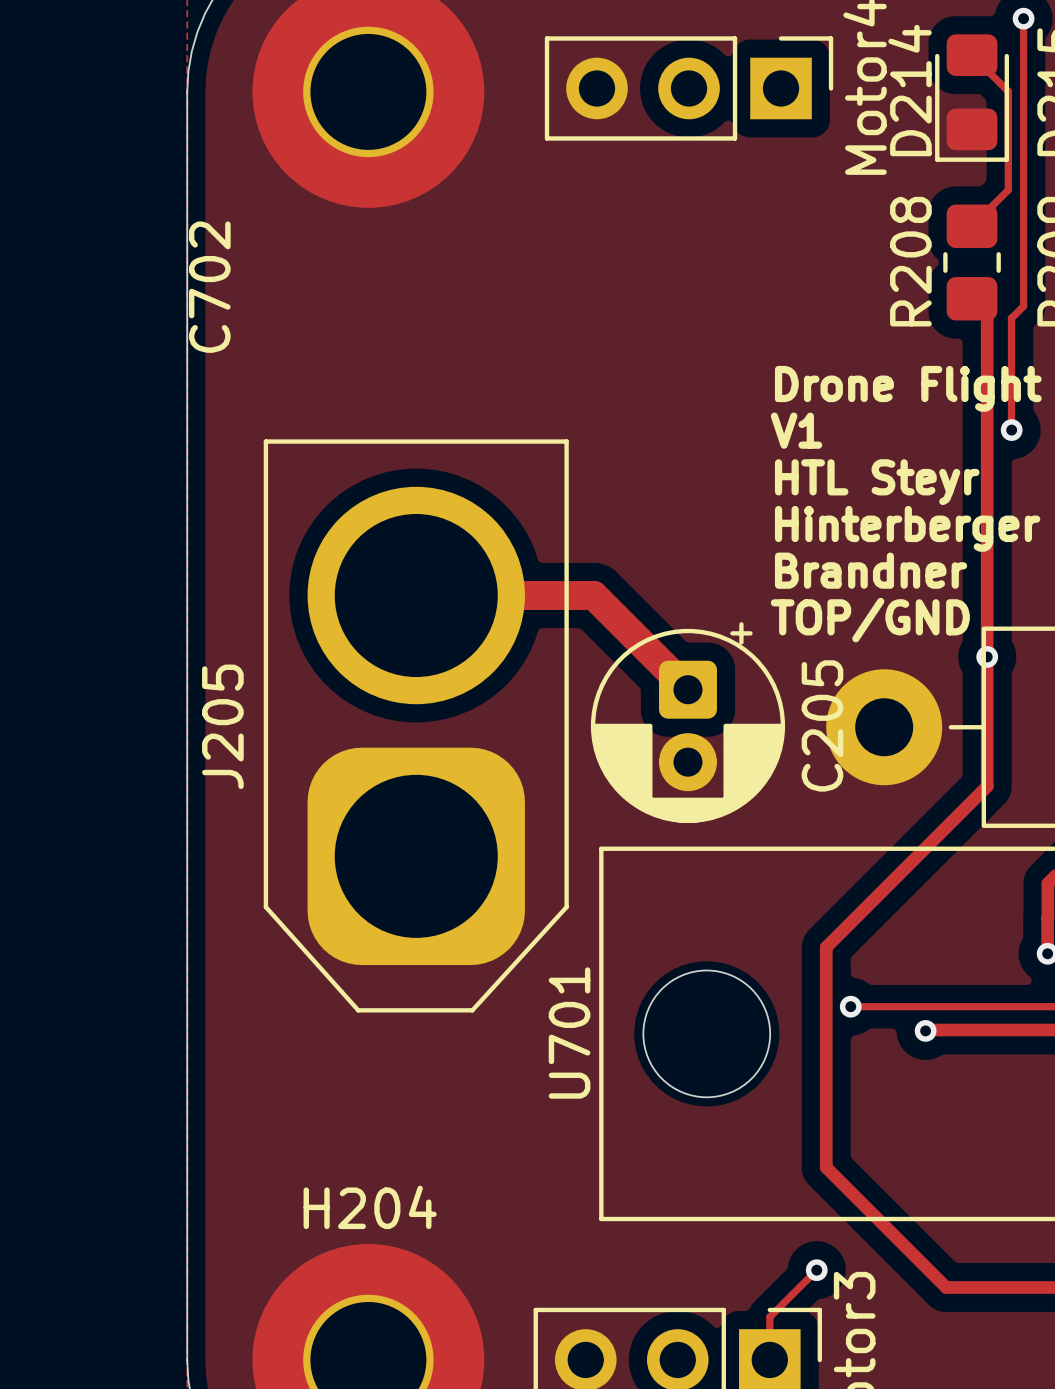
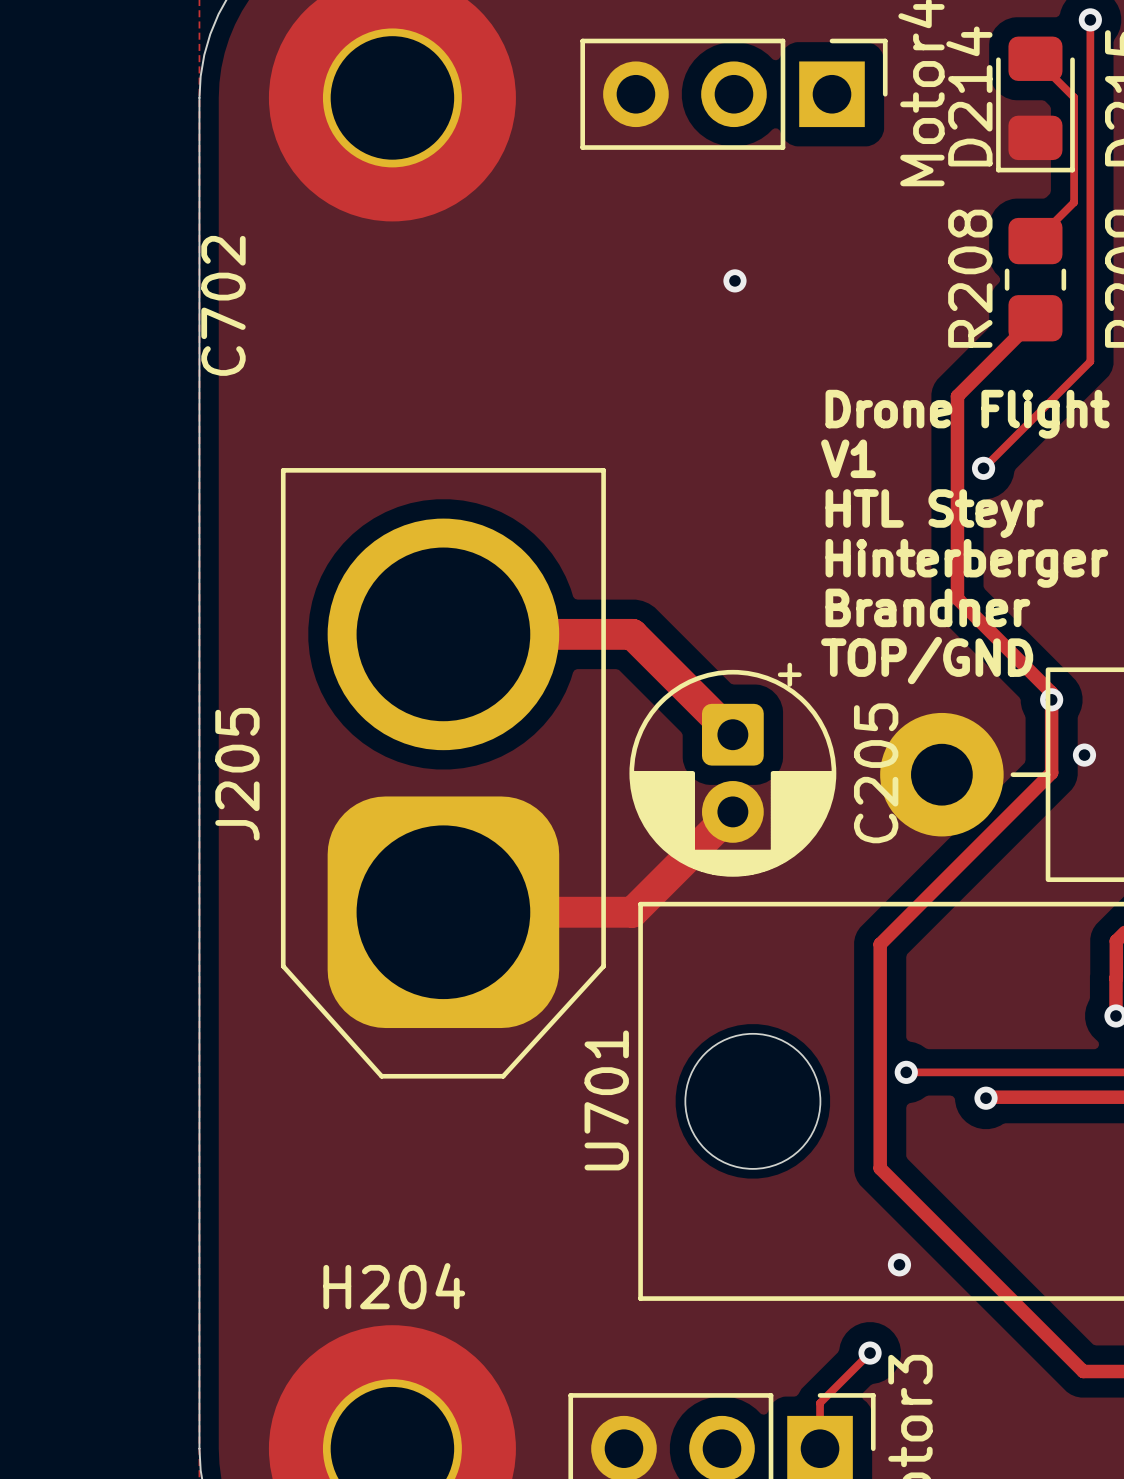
via: none -> (734, 280)
track: (972, 298) (987, 313) (987, 650) -> (1035, 318) (957, 396) (957, 598) (1051, 692)
track: (1023, 306) (1011, 318) (1011, 429) -> (1090, 326) (1090, 361) (983, 468)
via position: (1011, 430) -> (983, 468)
via: none -> (1084, 755)
track: (987, 725) (987, 786) (826, 947) -> (1051, 772) (880, 944) (880, 1009)
track: none -> (732, 811) (632, 912) (443, 912)
track: (826, 1096) (826, 1167) (946, 1287) (1016, 1287) -> (880, 1168) (1083, 1371)
via: none -> (899, 1264)

